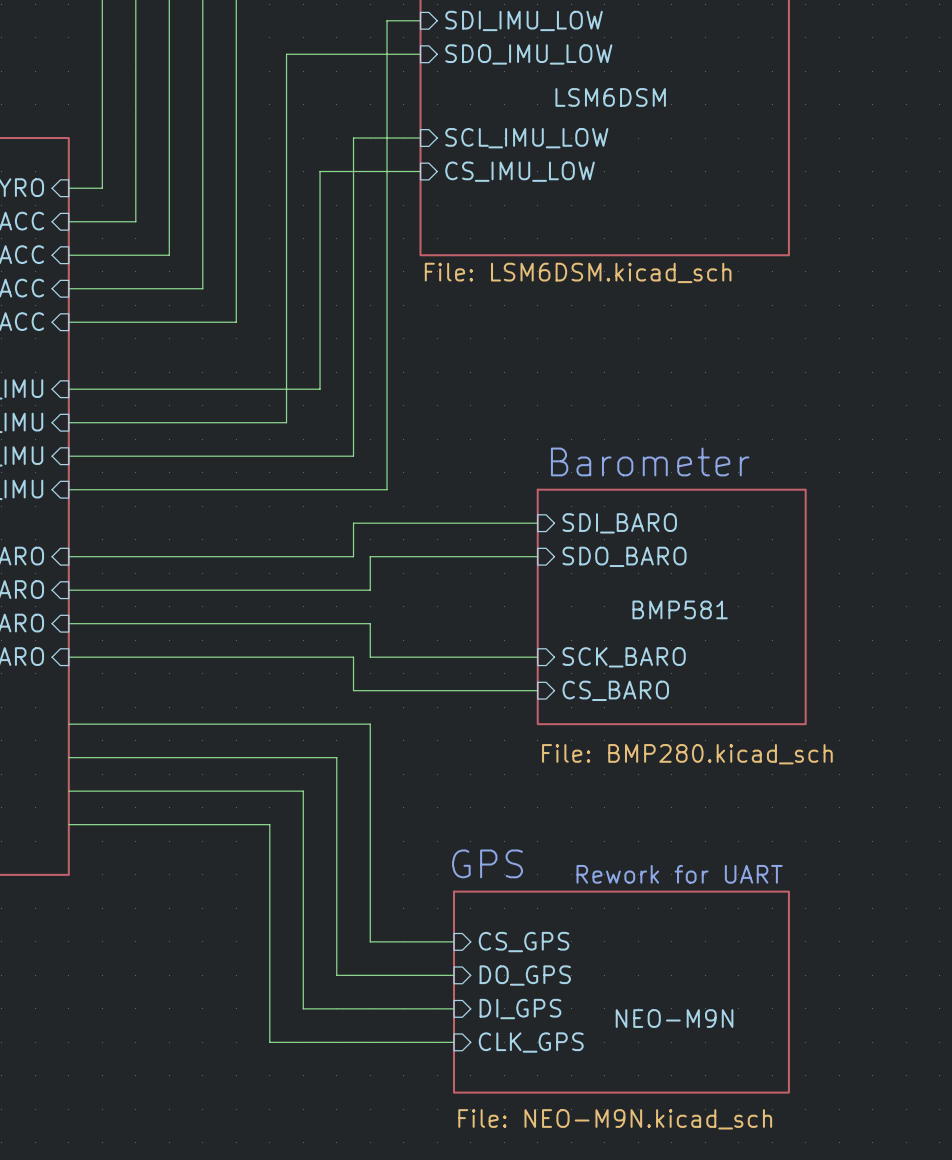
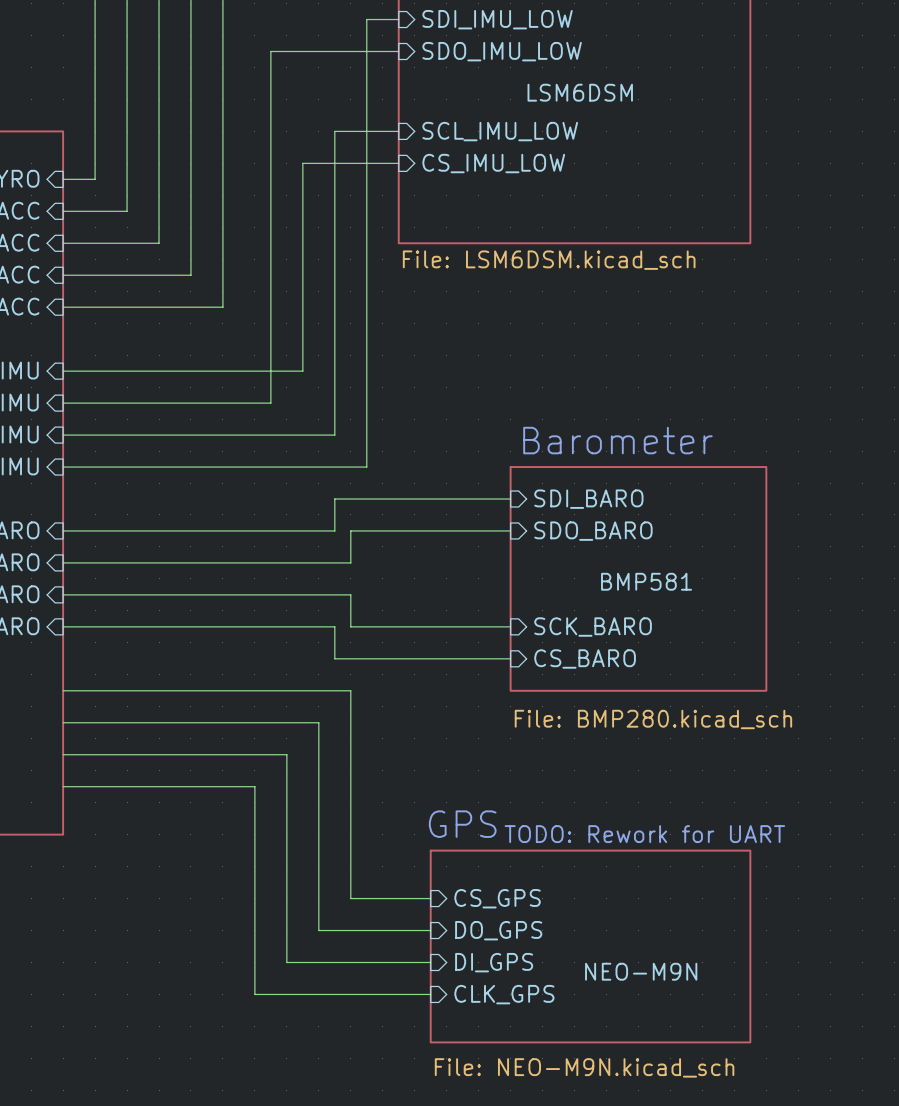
text: Rework for UART (679, 874) -> TODO: Rework for UART (644, 834)

